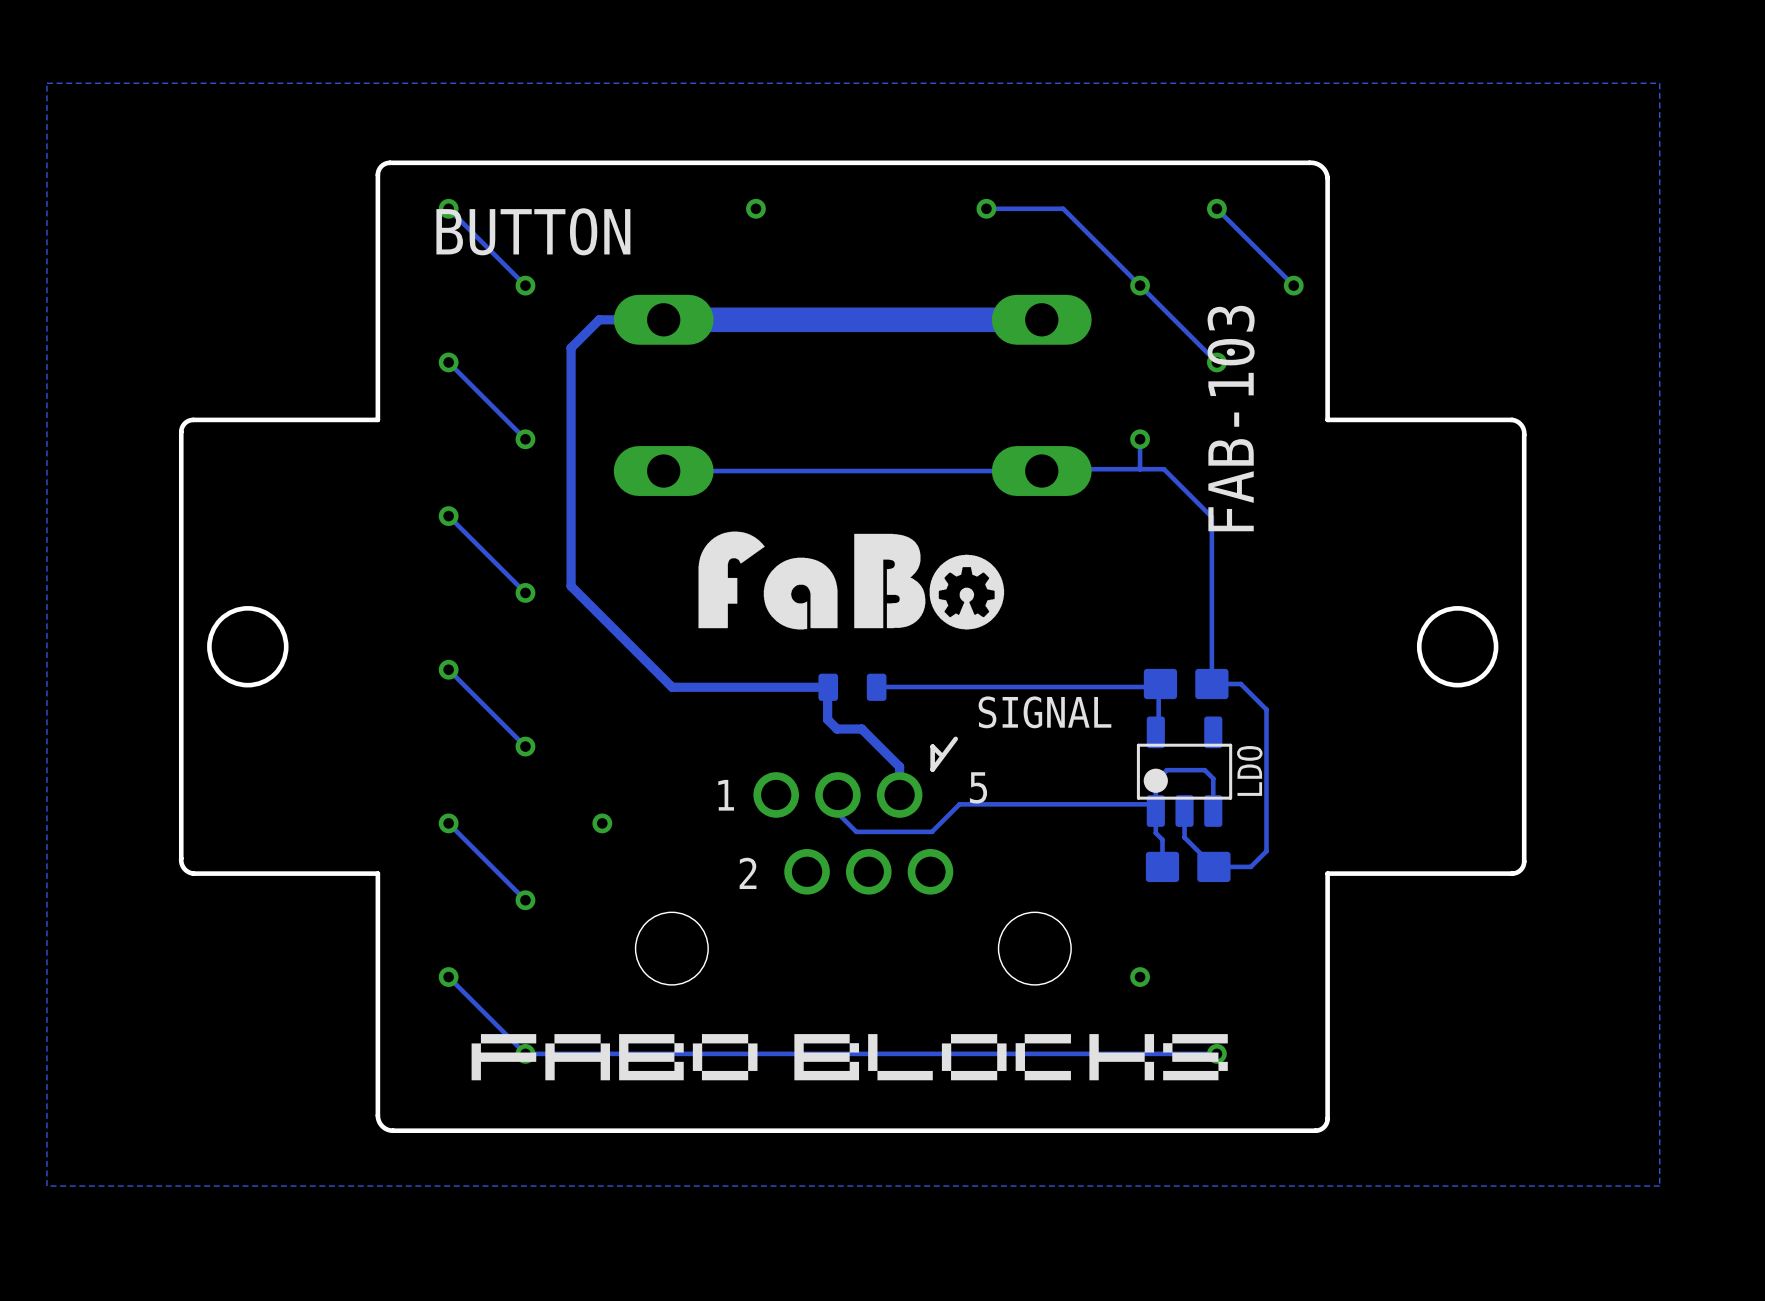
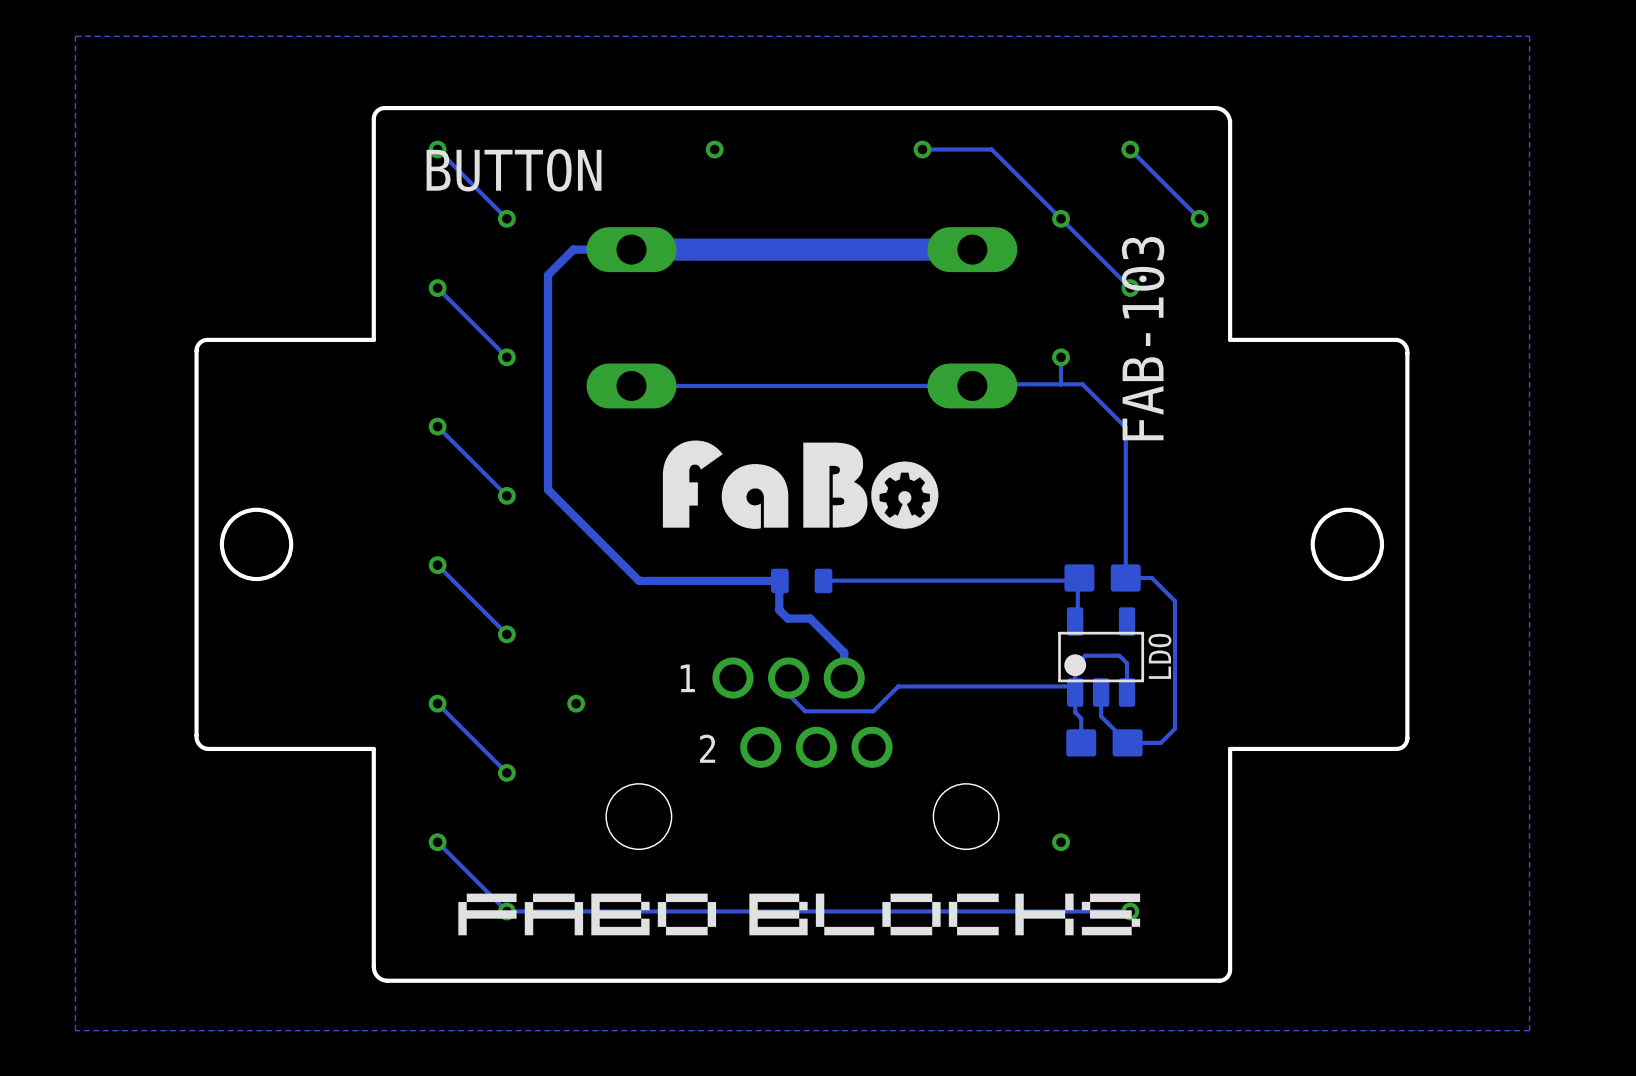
text: SIGNAL (1044, 712) -> none
line: (955, 738) (932, 769) (932, 746) (940, 754) -> none
text: 5 (978, 787) -> none

